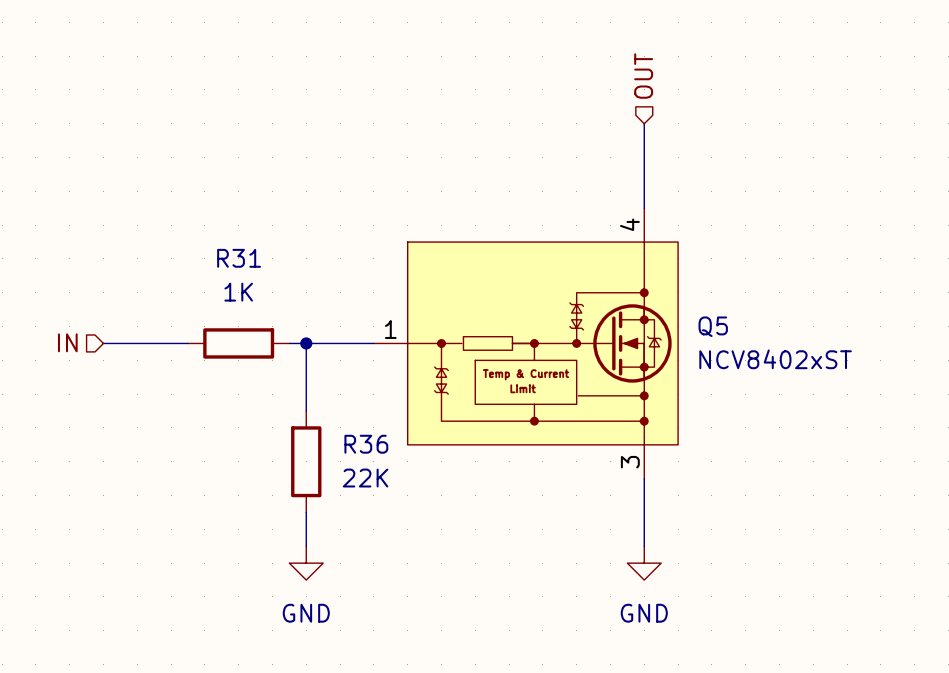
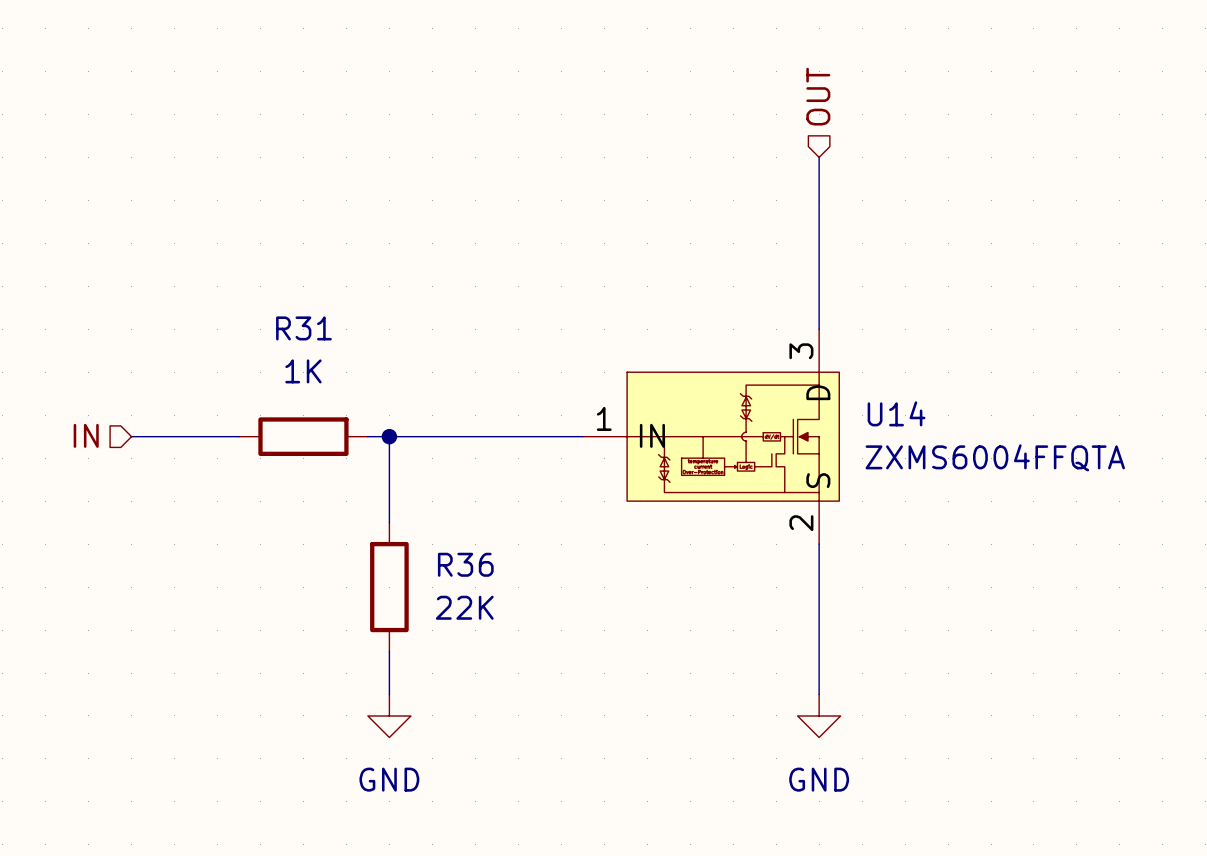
Q5: NCV8402xST (525, 343) -> none
U14: none -> ZXMS6004FFQTA (711, 436)

